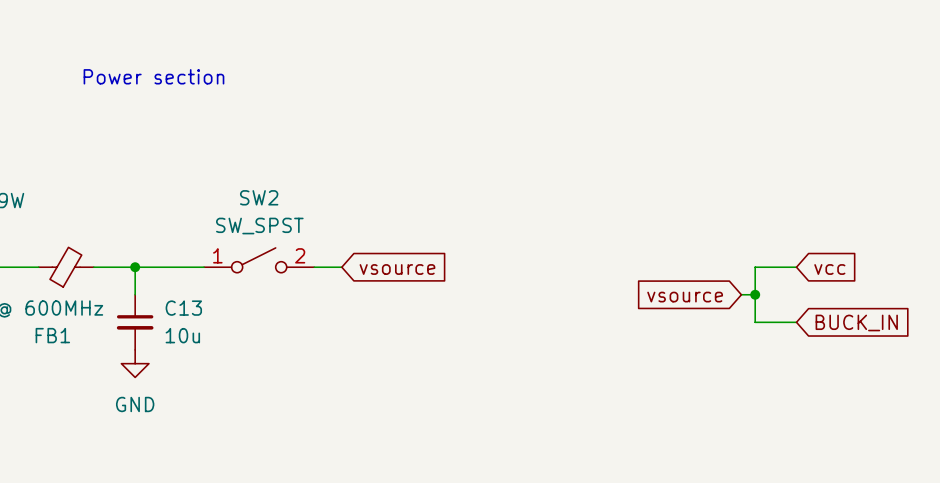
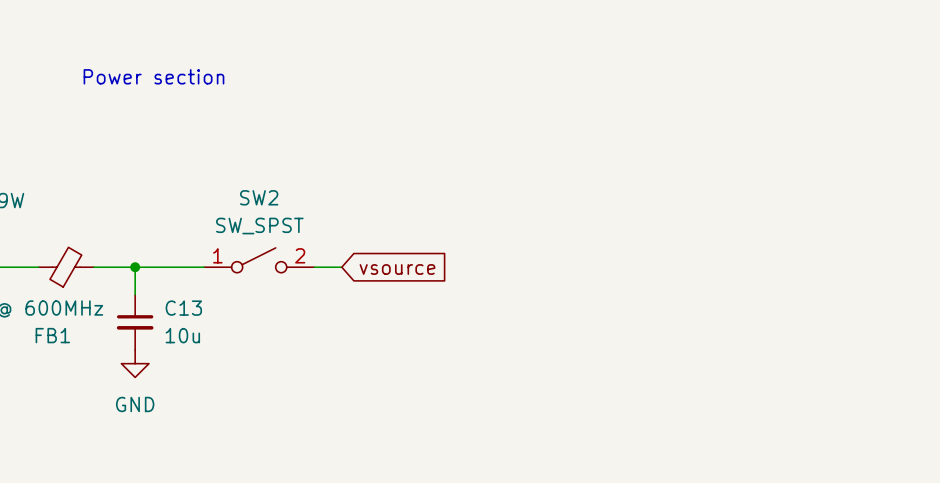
wire: (796, 267) (755, 267) (755, 322) (796, 322) -> none
global label: vcc (829, 269) -> none
wire: (741, 294) (755, 294) -> none
junction: (755, 294) -> none
global label: vsource (685, 297) -> none
global label: BUCK_IN (856, 322) -> none

